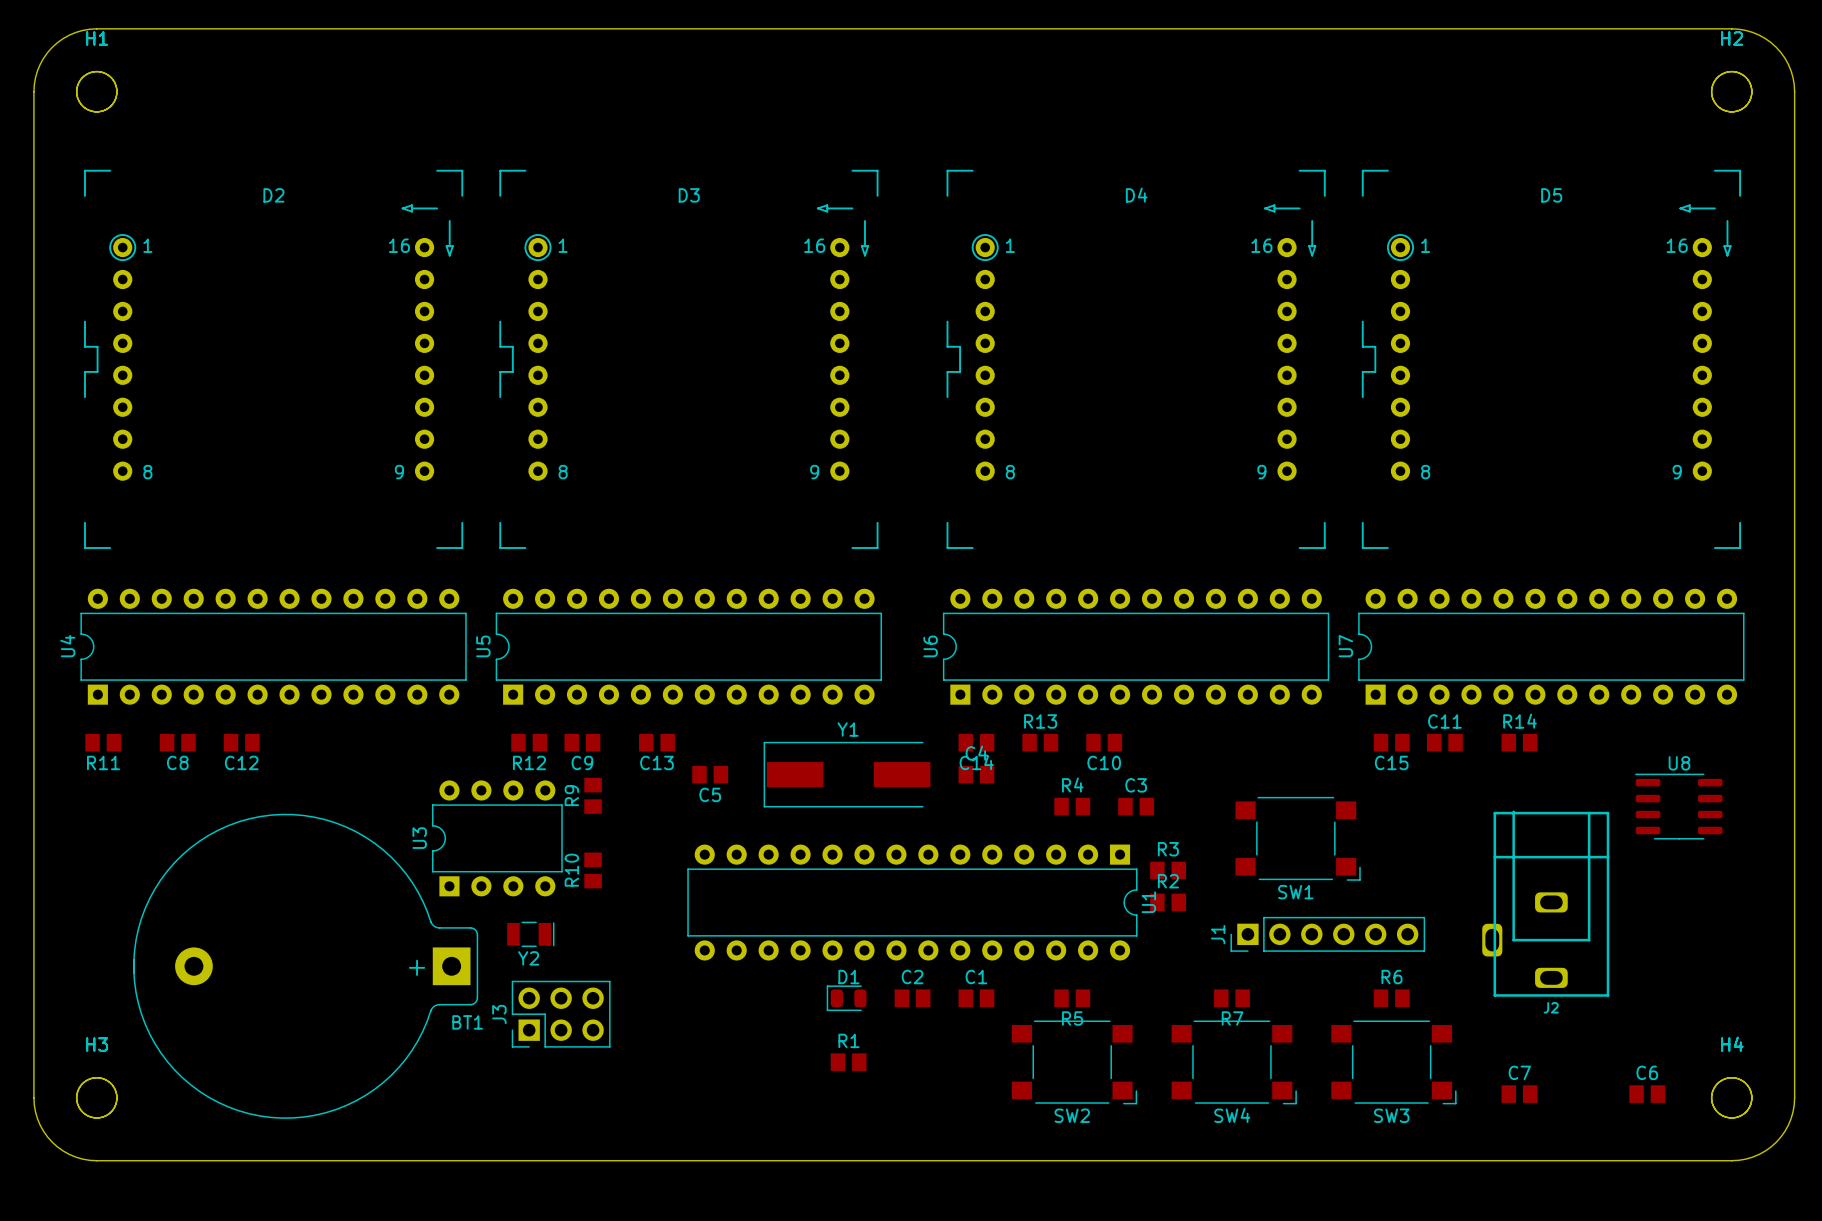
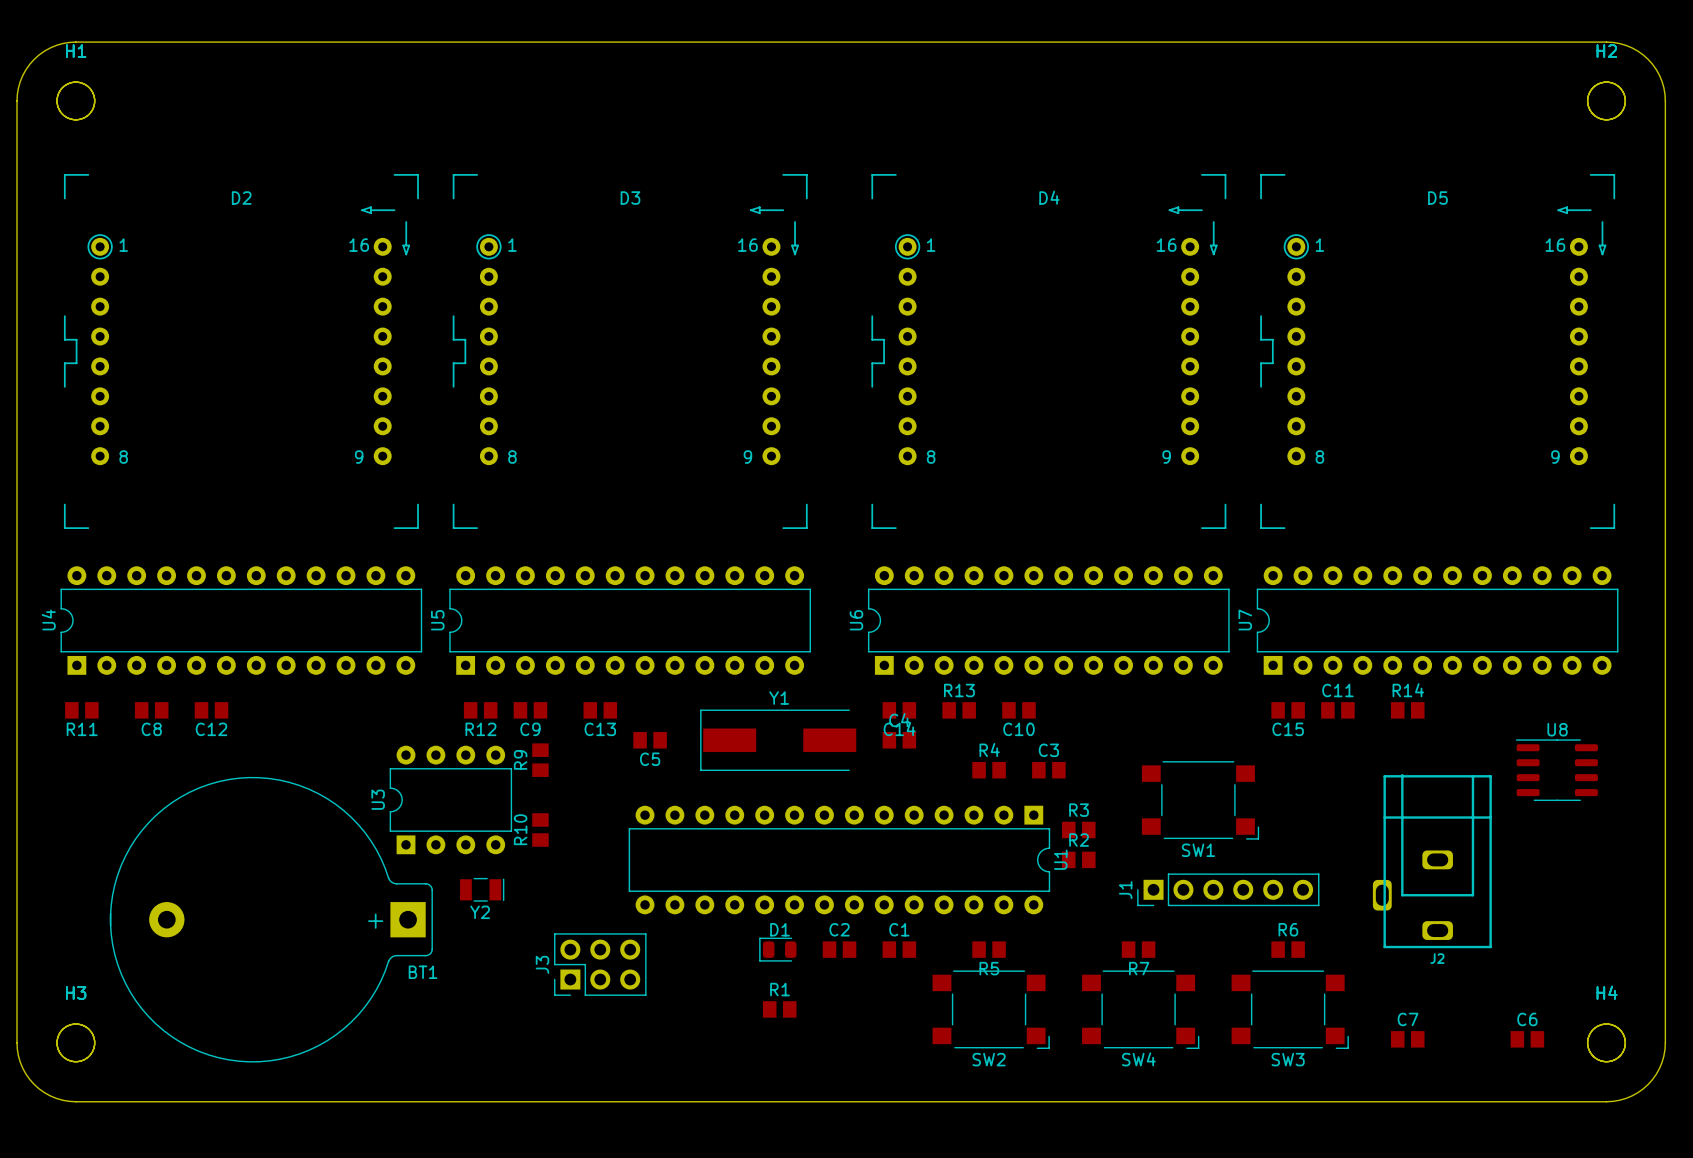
J3 position: (561, 1014) -> (600, 964)

